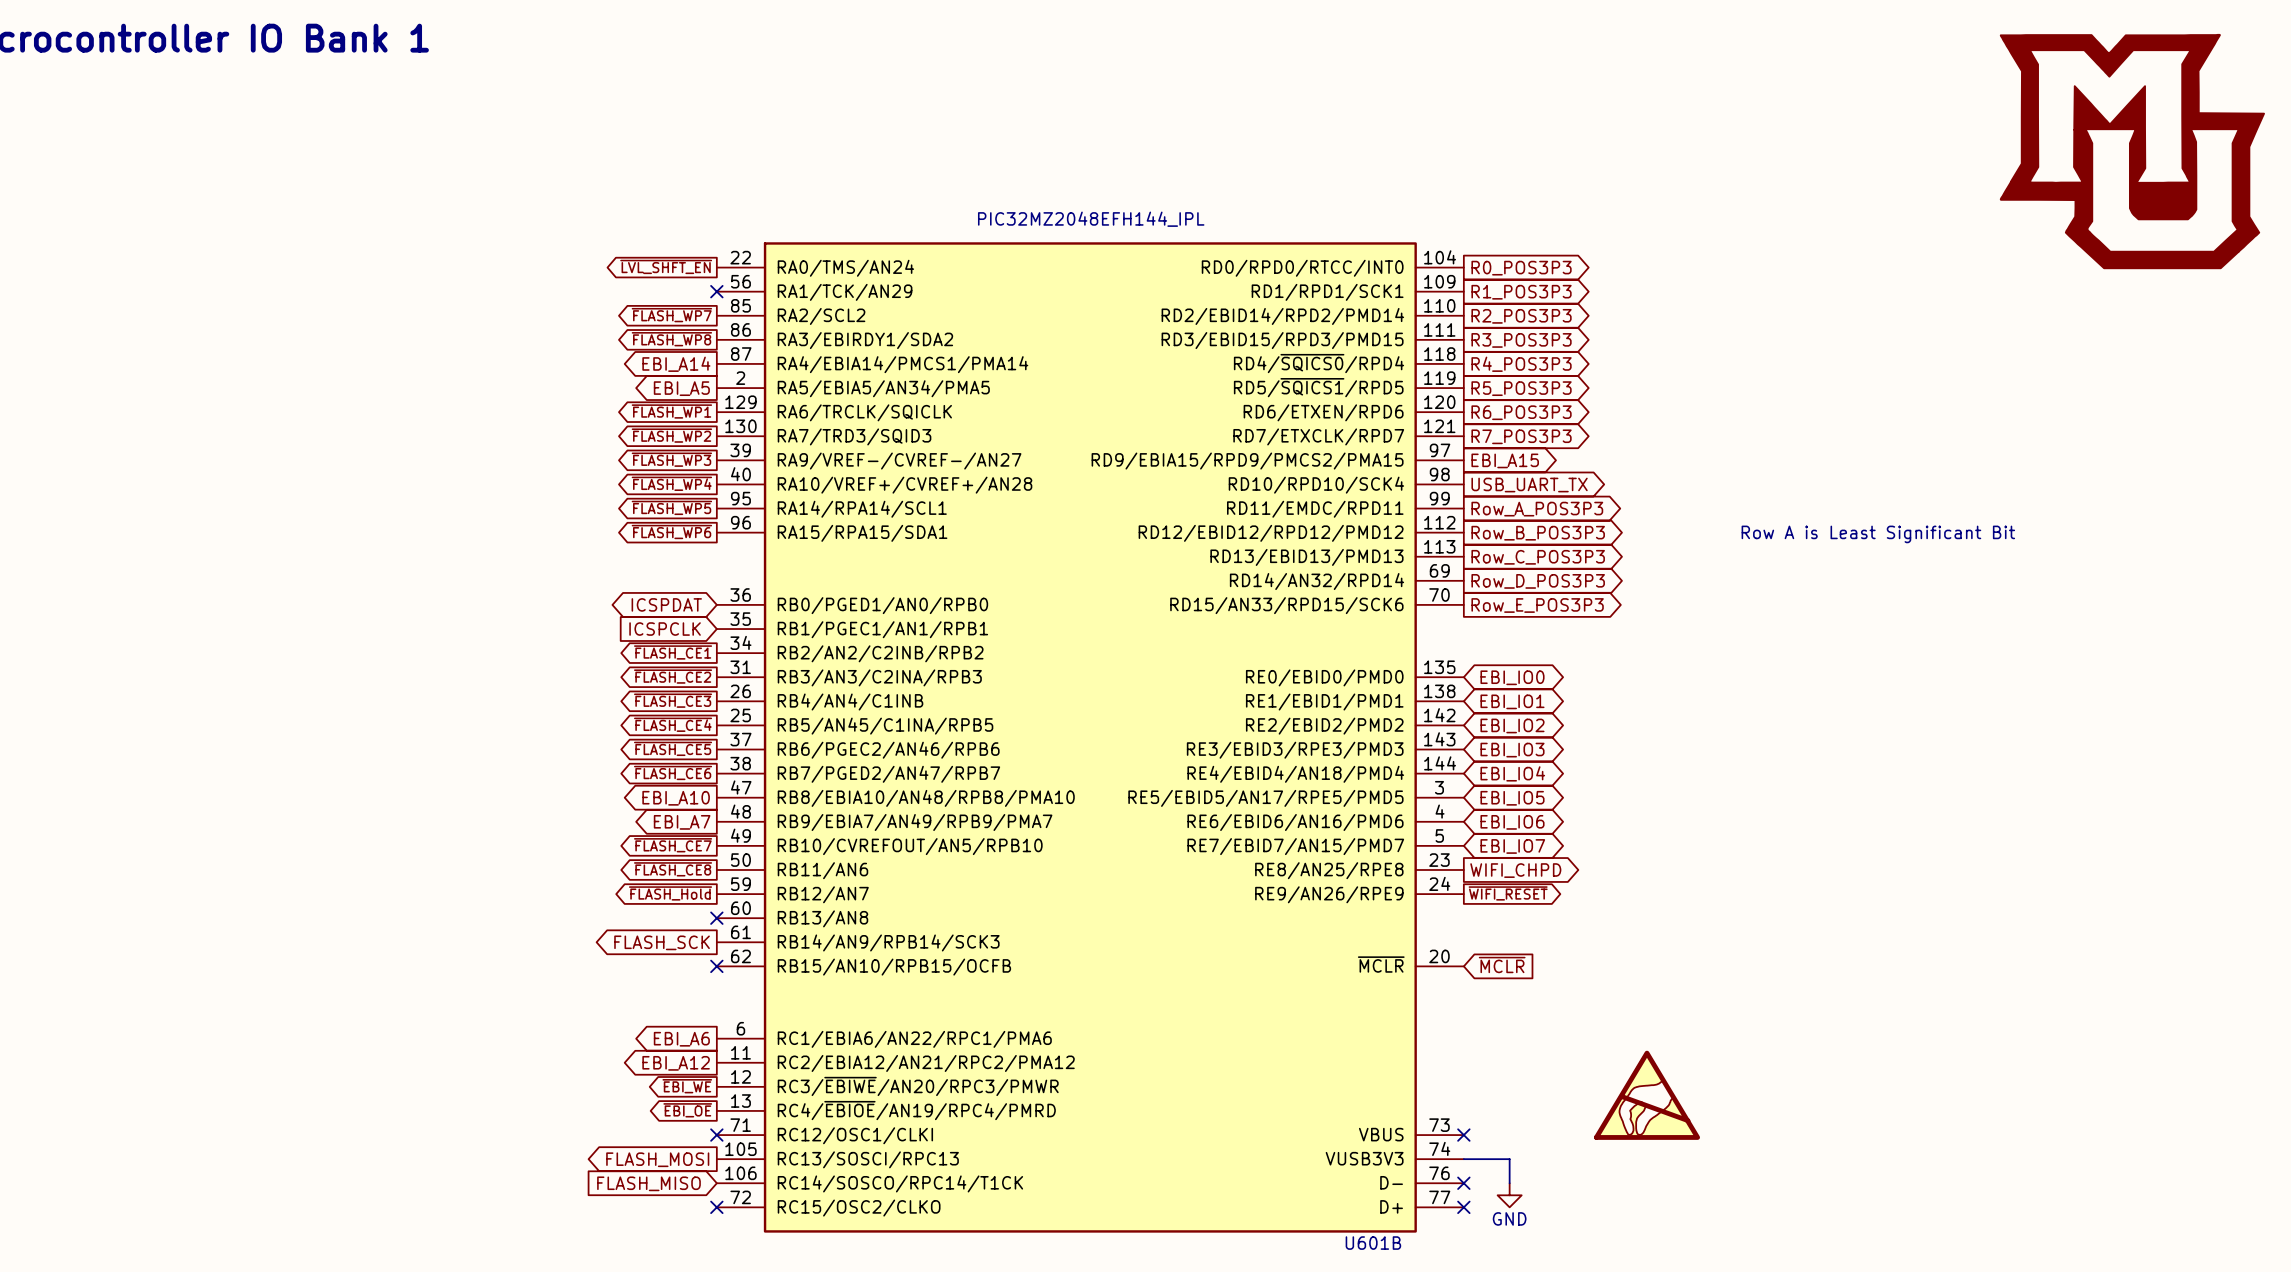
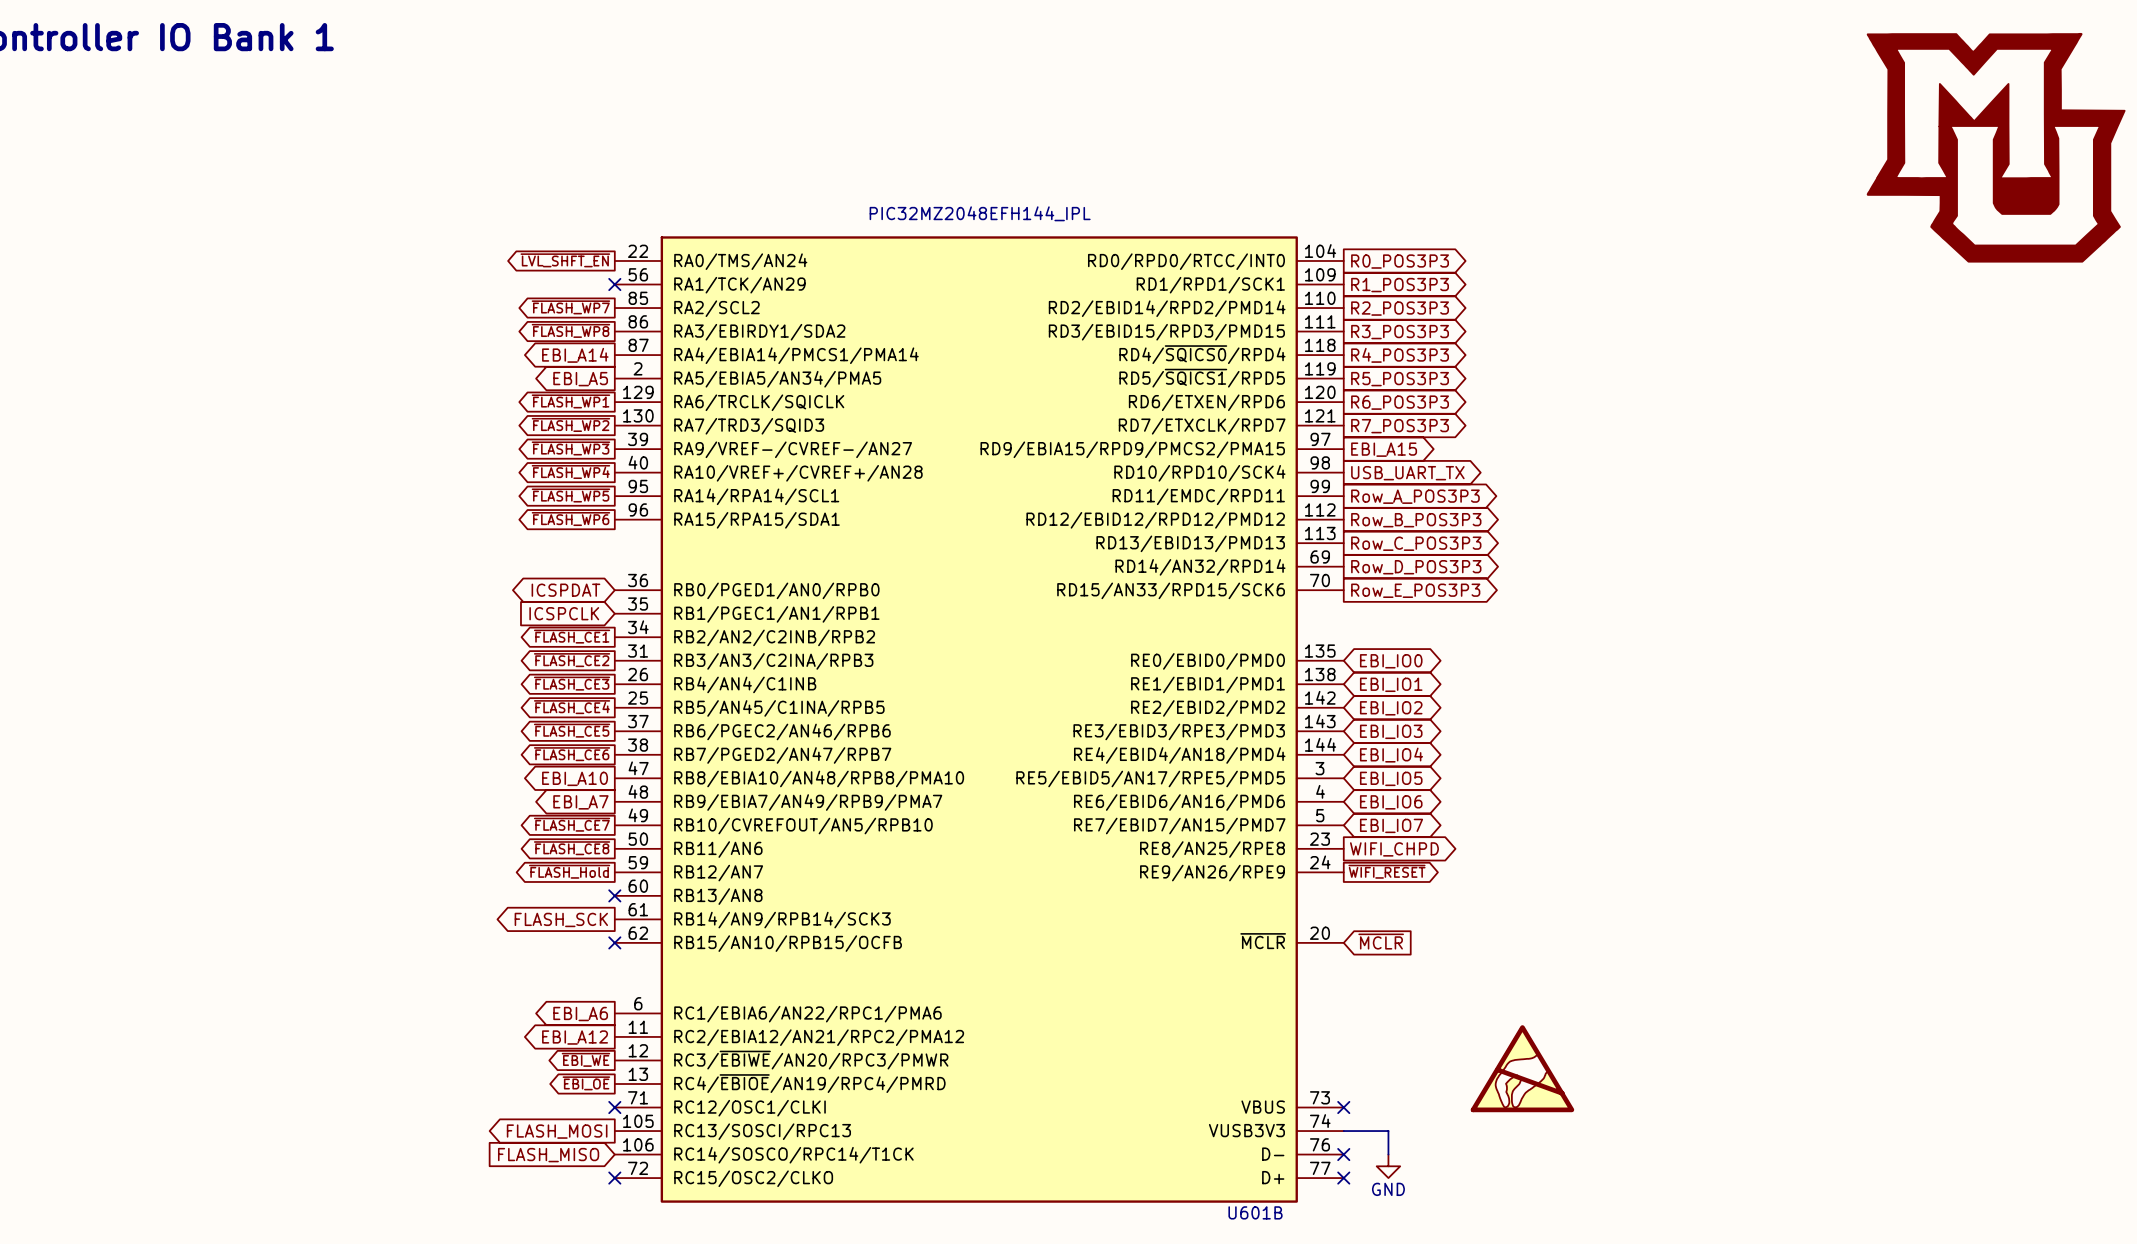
text: Row A is Least Significant Bit (1878, 534) -> none

